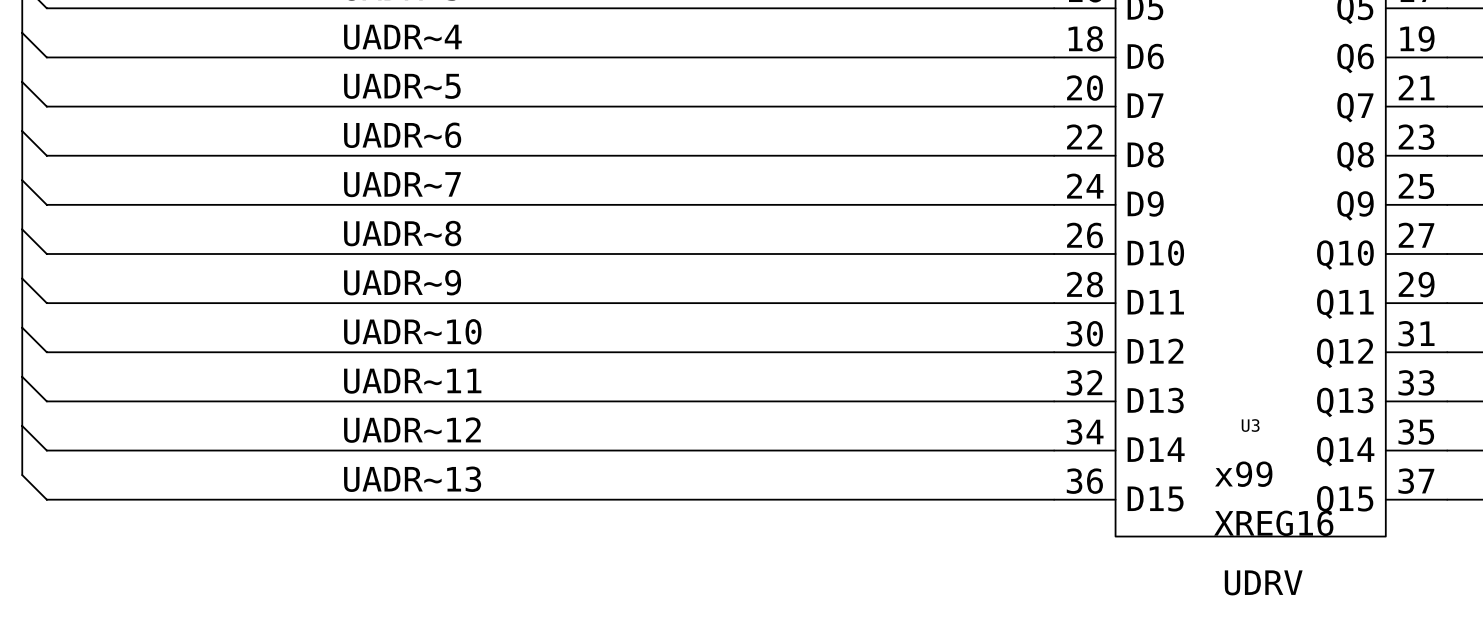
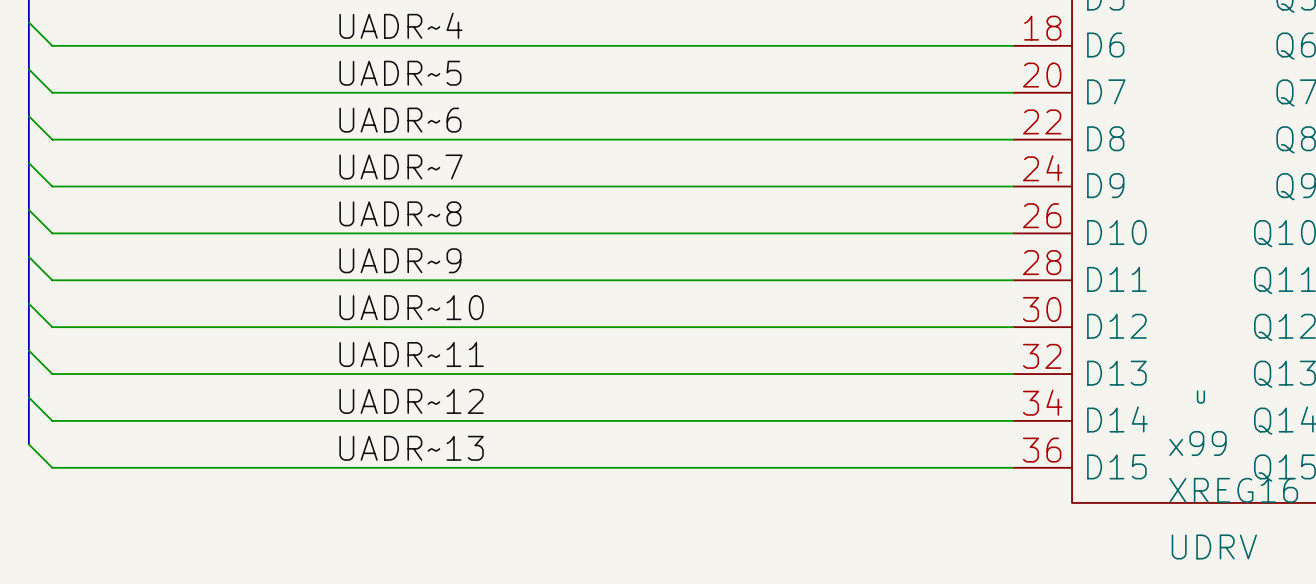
U3 name: U3 (1250, 425) -> U (1200, 397)

